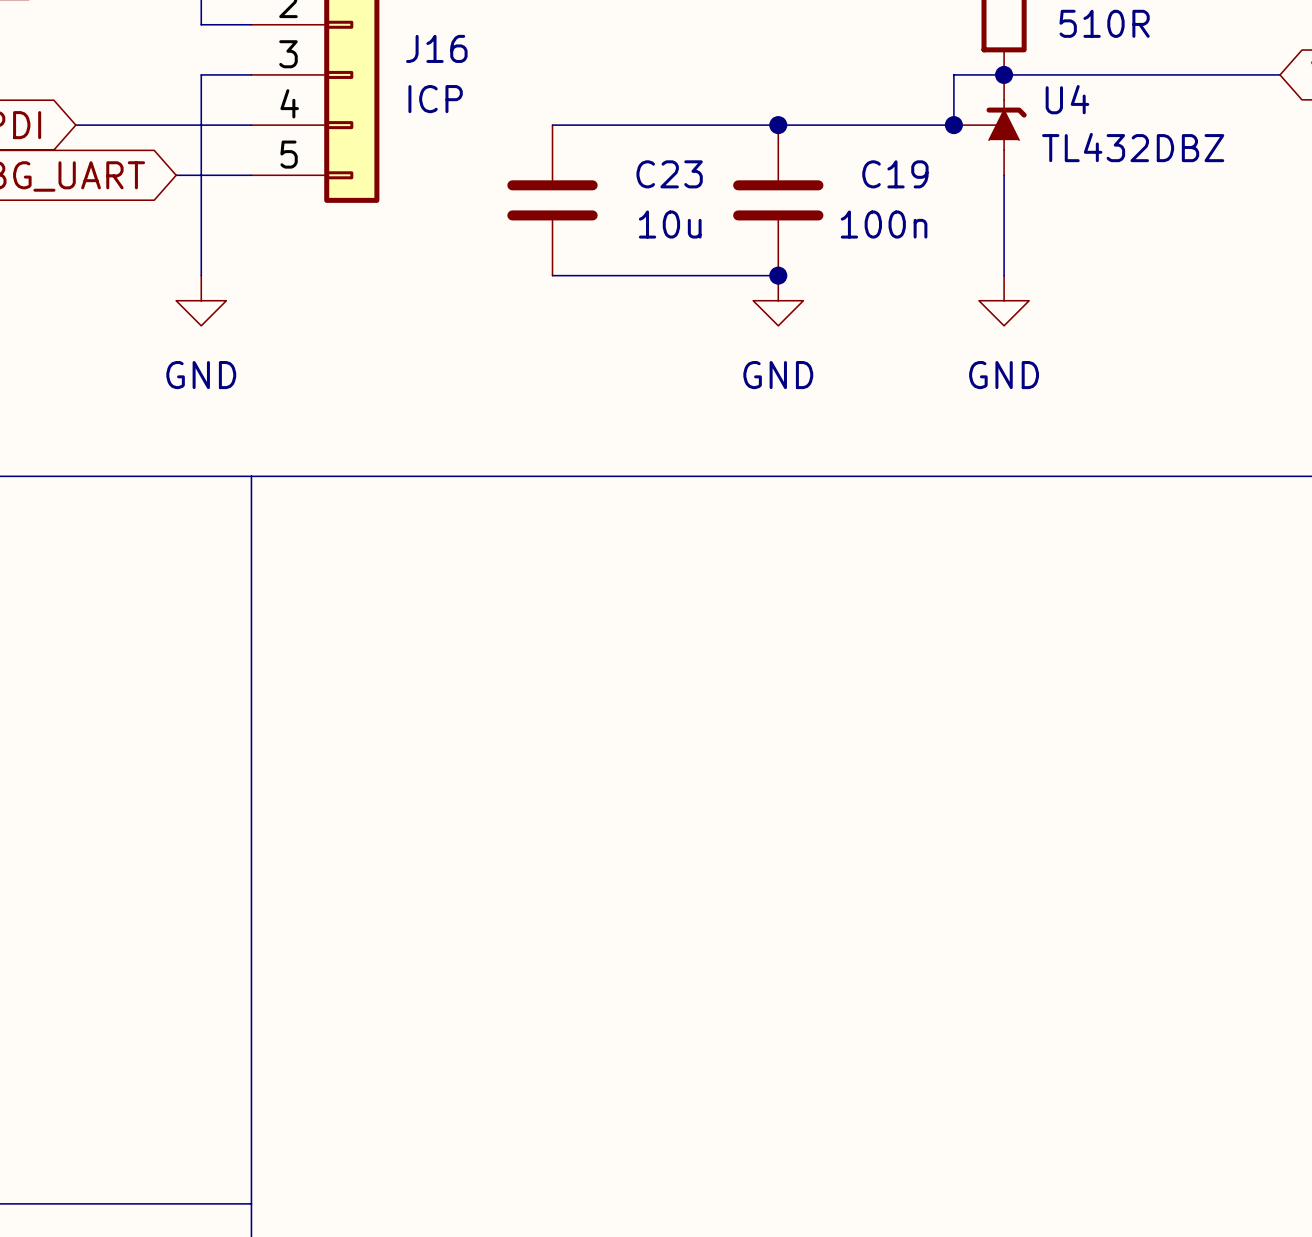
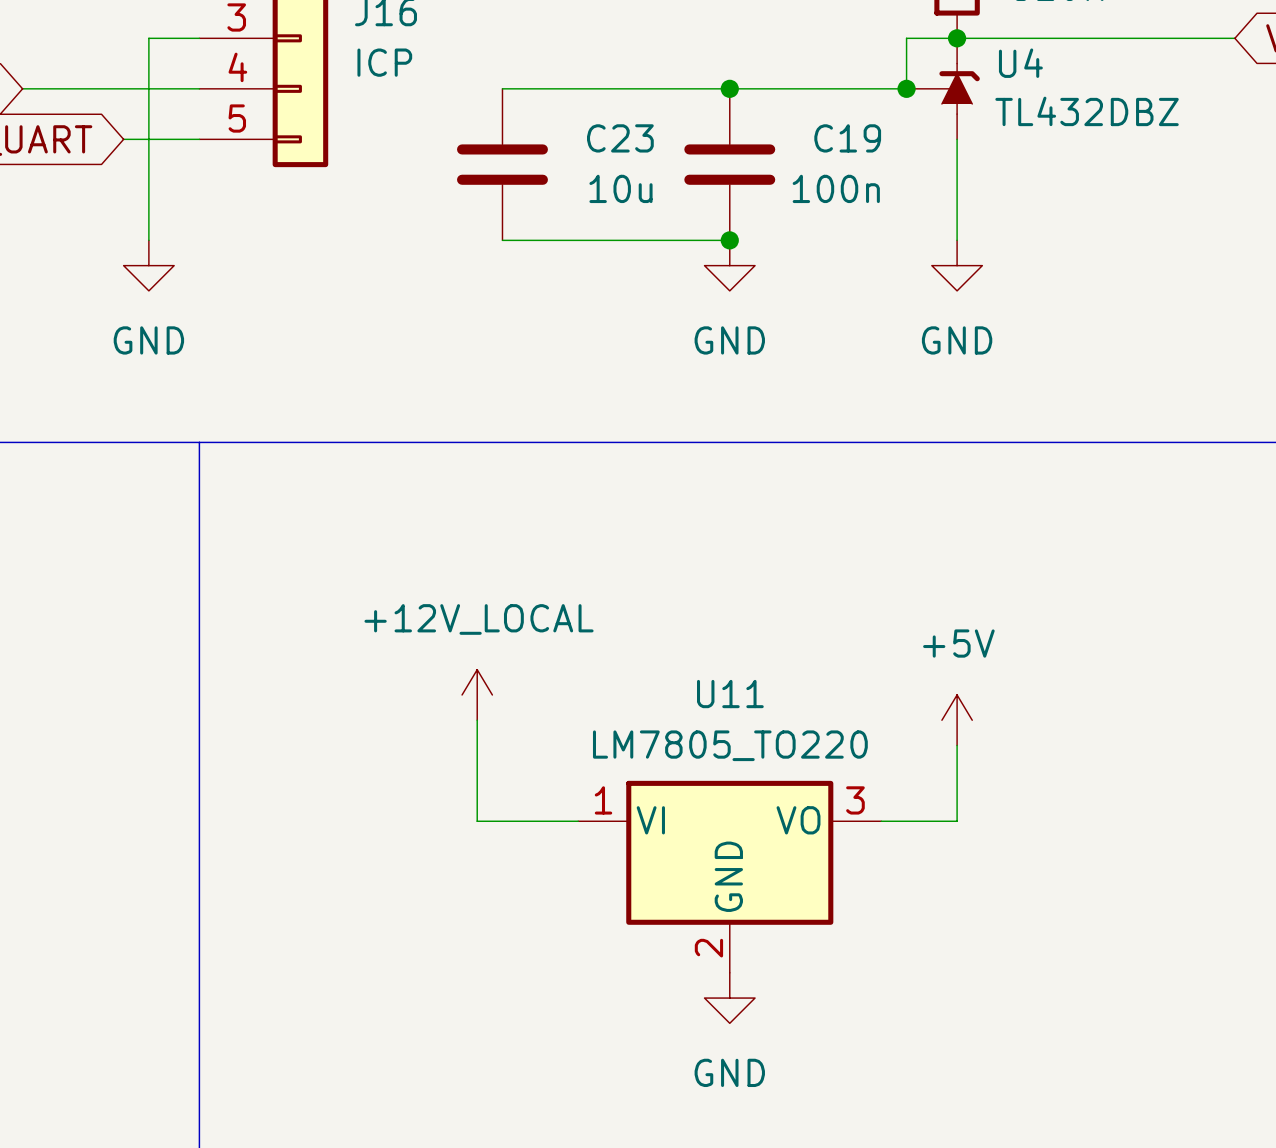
power symbol: none -> +12V_LOCAL (477, 694)
wire: none -> (477, 720) (477, 821) (578, 821)
power symbol: none -> +5V (957, 720)
wire: none -> (957, 745) (957, 821) (881, 821)
U11: none -> LM7805_TO220 (729, 876)
power symbol: none -> GND (729, 998)

